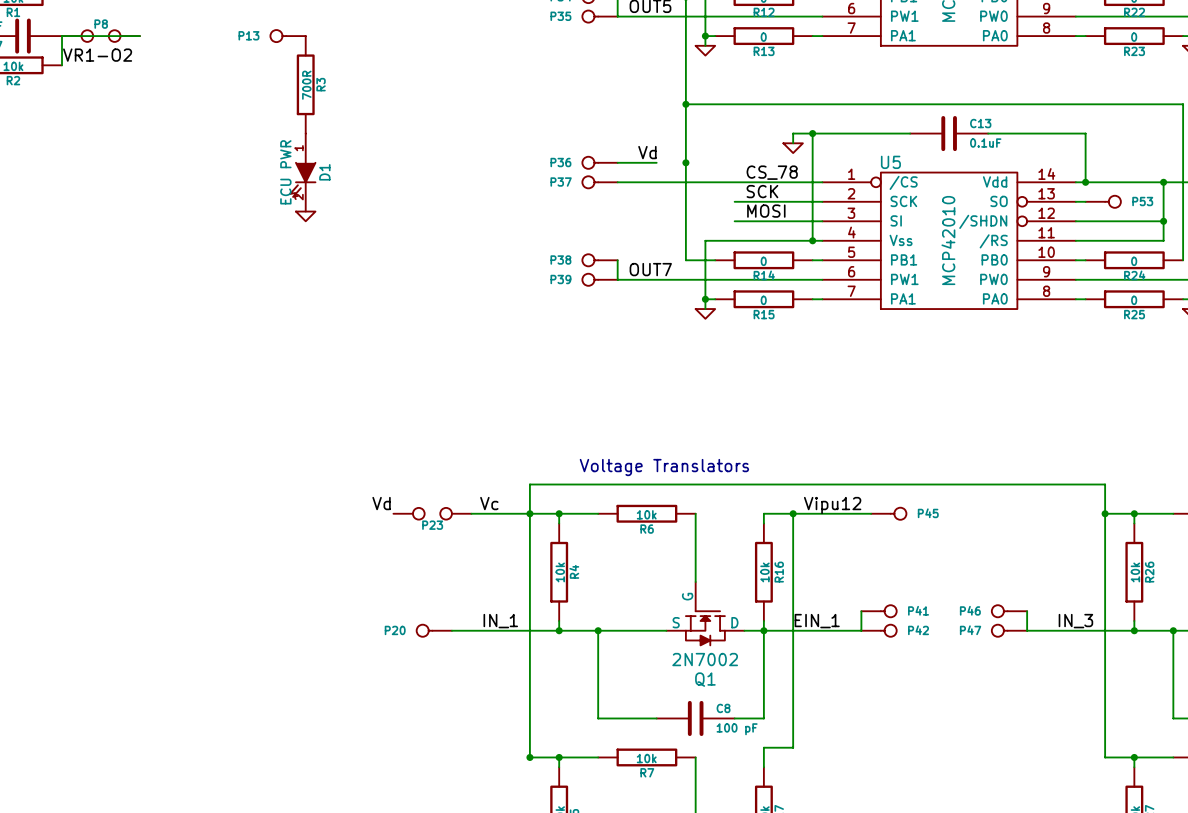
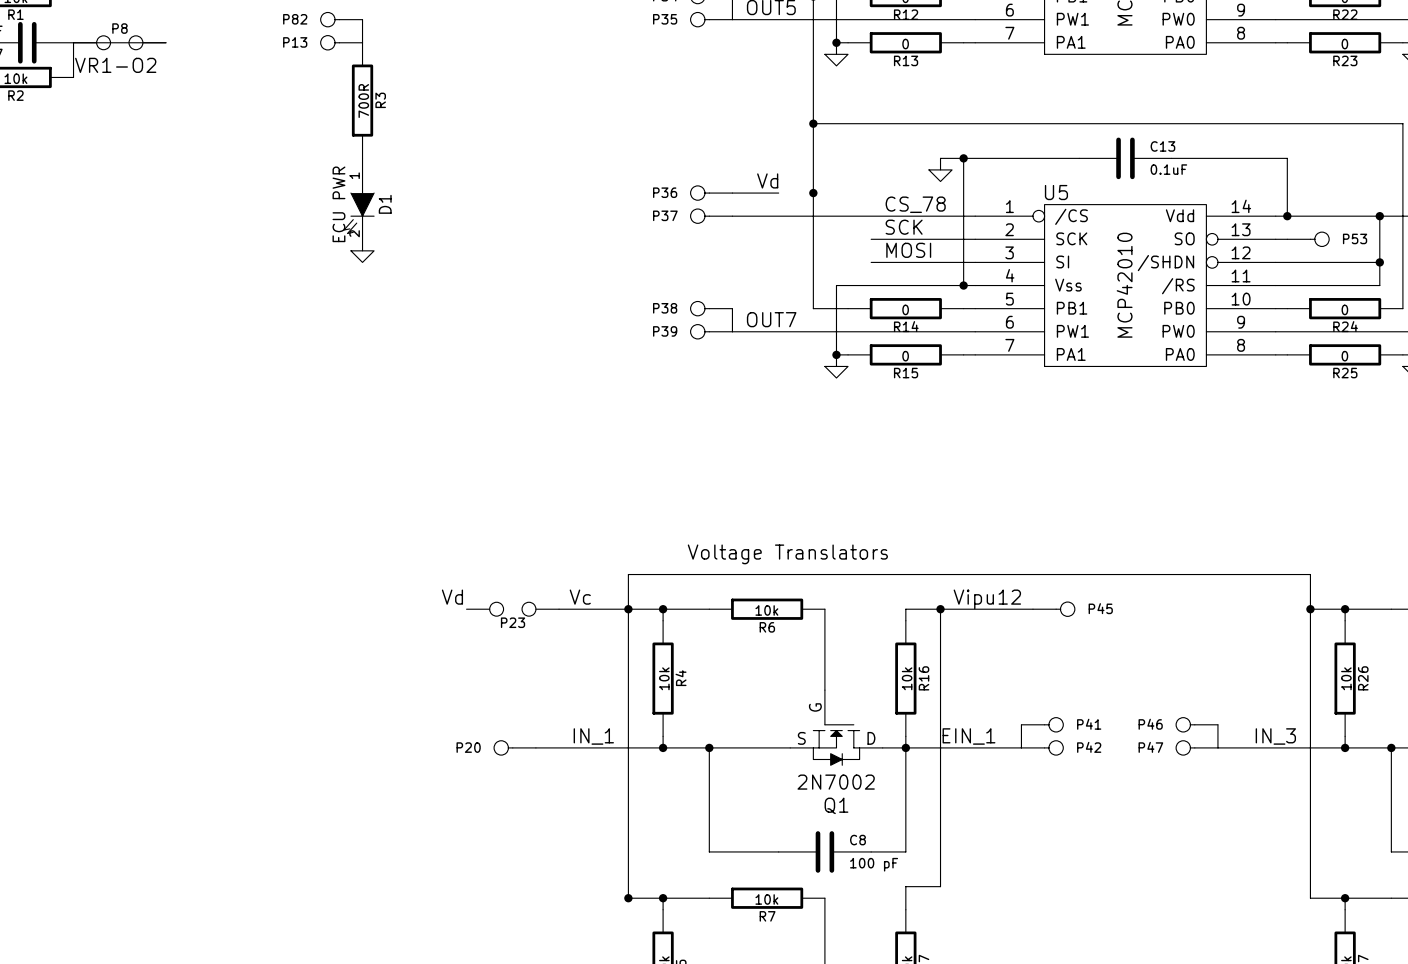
P82: none -> (341, 19)
wire: none -> (362, 19) (362, 42)

